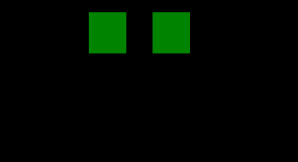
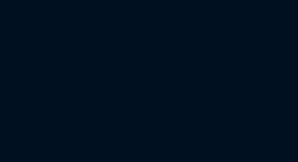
part: (139, 32) -> none

